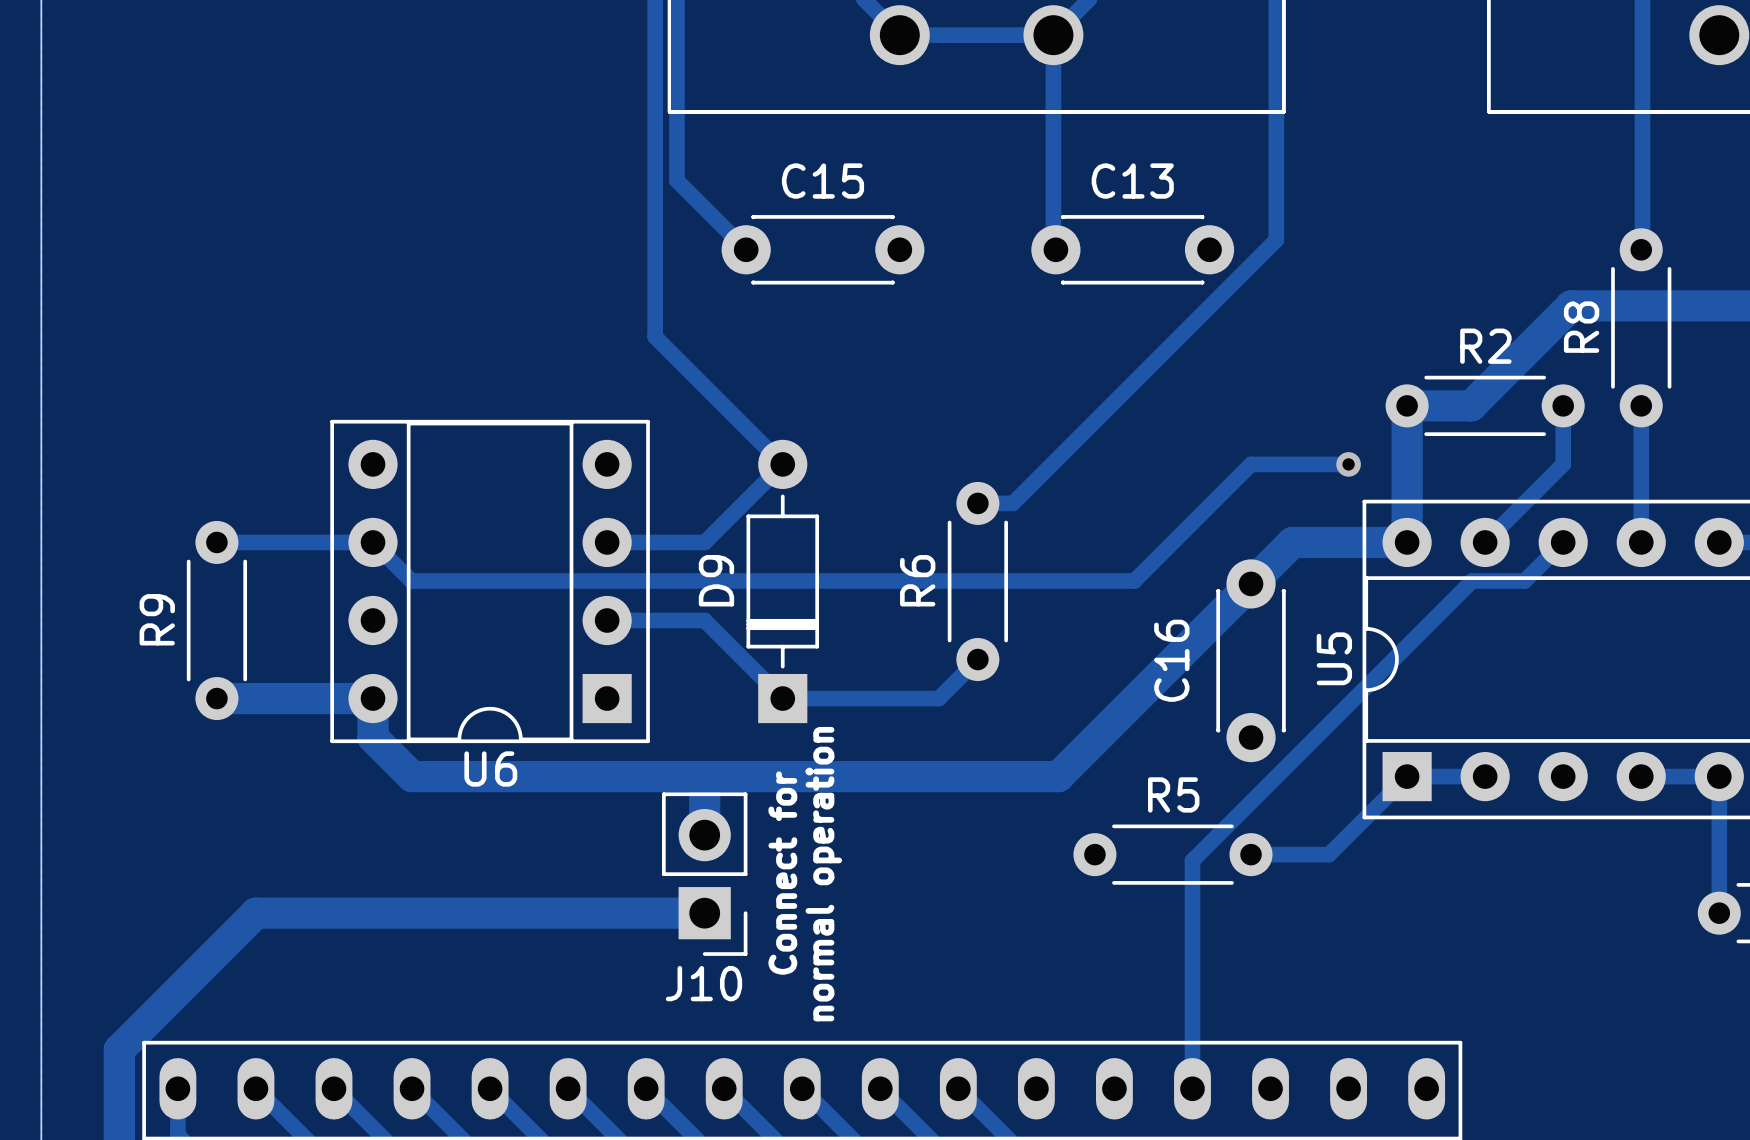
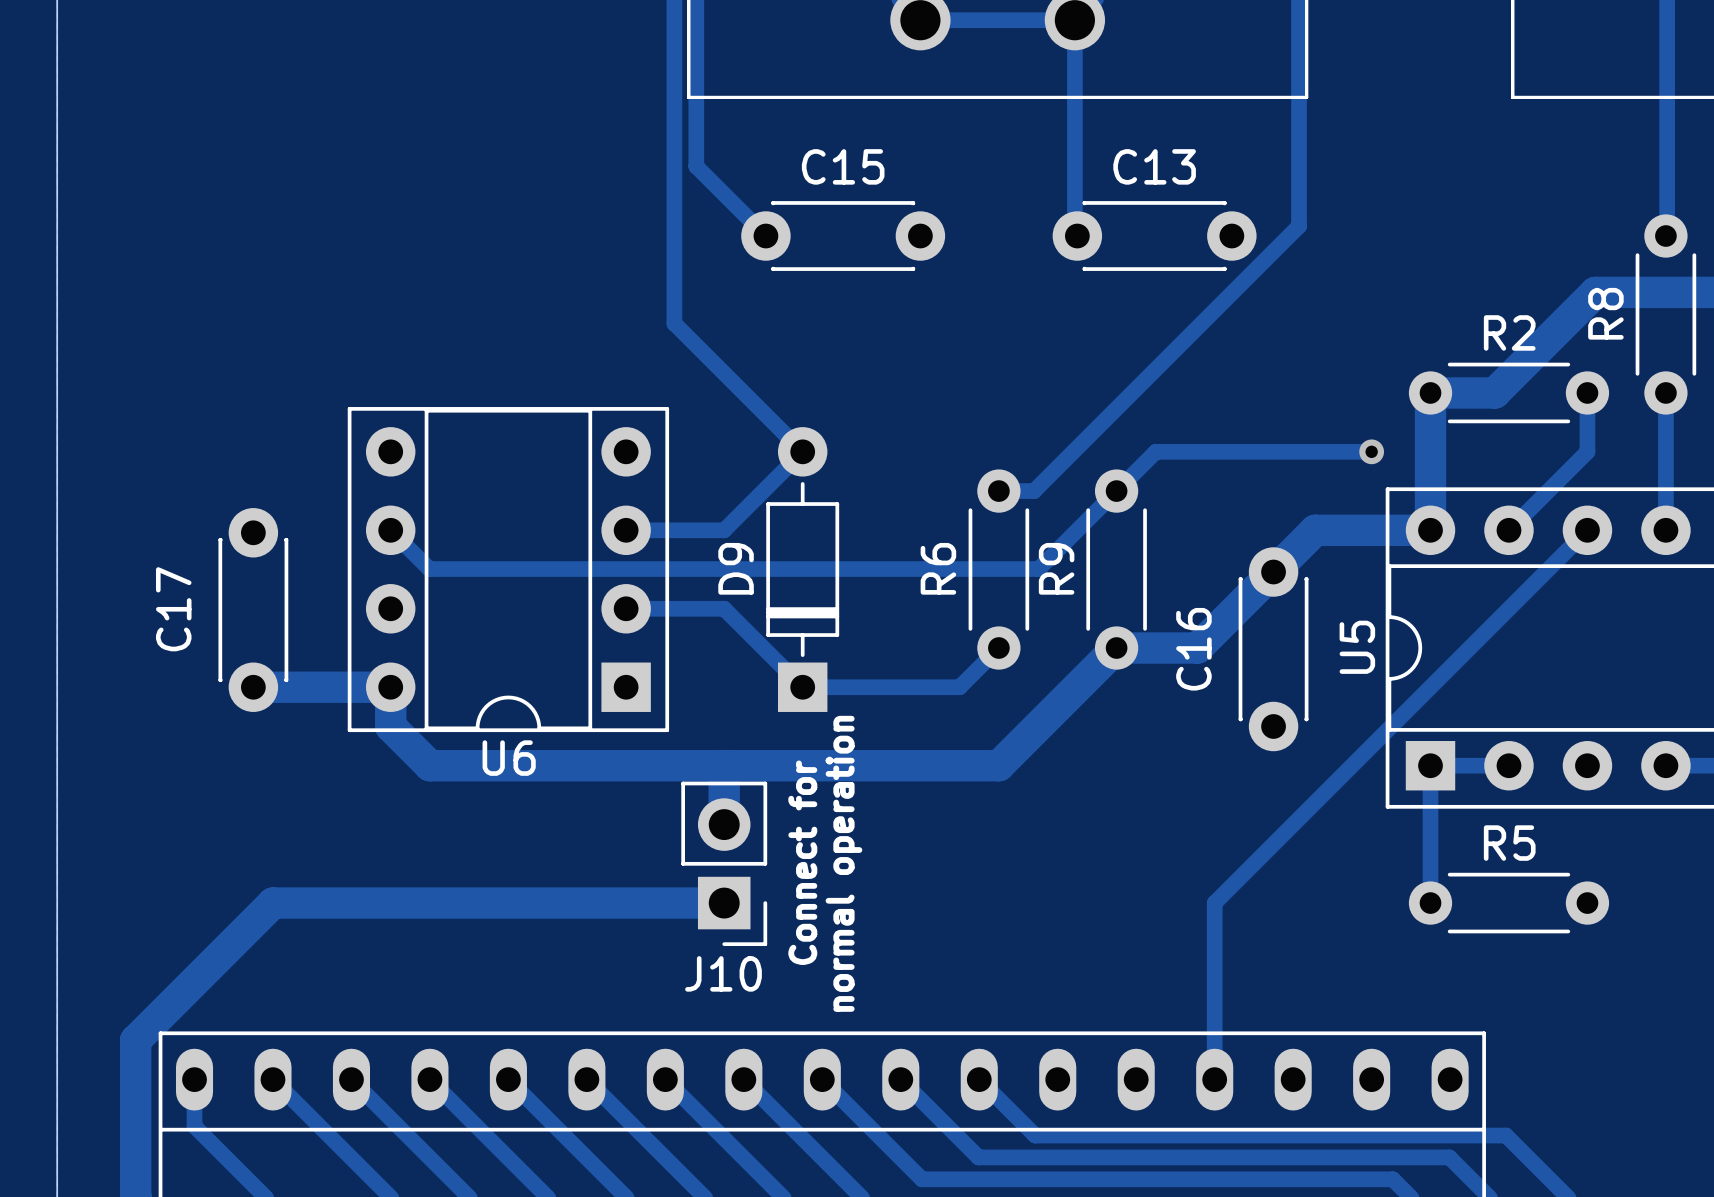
track: (1251, 464) (1134, 580) (1017, 580) -> (1273, 451) (1155, 451) (1038, 569)
track: (216, 542) (373, 542) -> none
track: (1524, 580) (1472, 580) (1192, 860) (1192, 913) -> (1548, 569) (1214, 903)
R9 position: (216, 620) -> (1116, 569)
C17: none -> (253, 610)
track: (1175, 659) (1058, 776) (977, 776) -> (1197, 648) (1116, 648) (998, 765)
track: (1407, 776) (1329, 854) (1251, 854) -> (1430, 765) (1430, 903)
R5 position: (1172, 854) -> (1508, 903)

